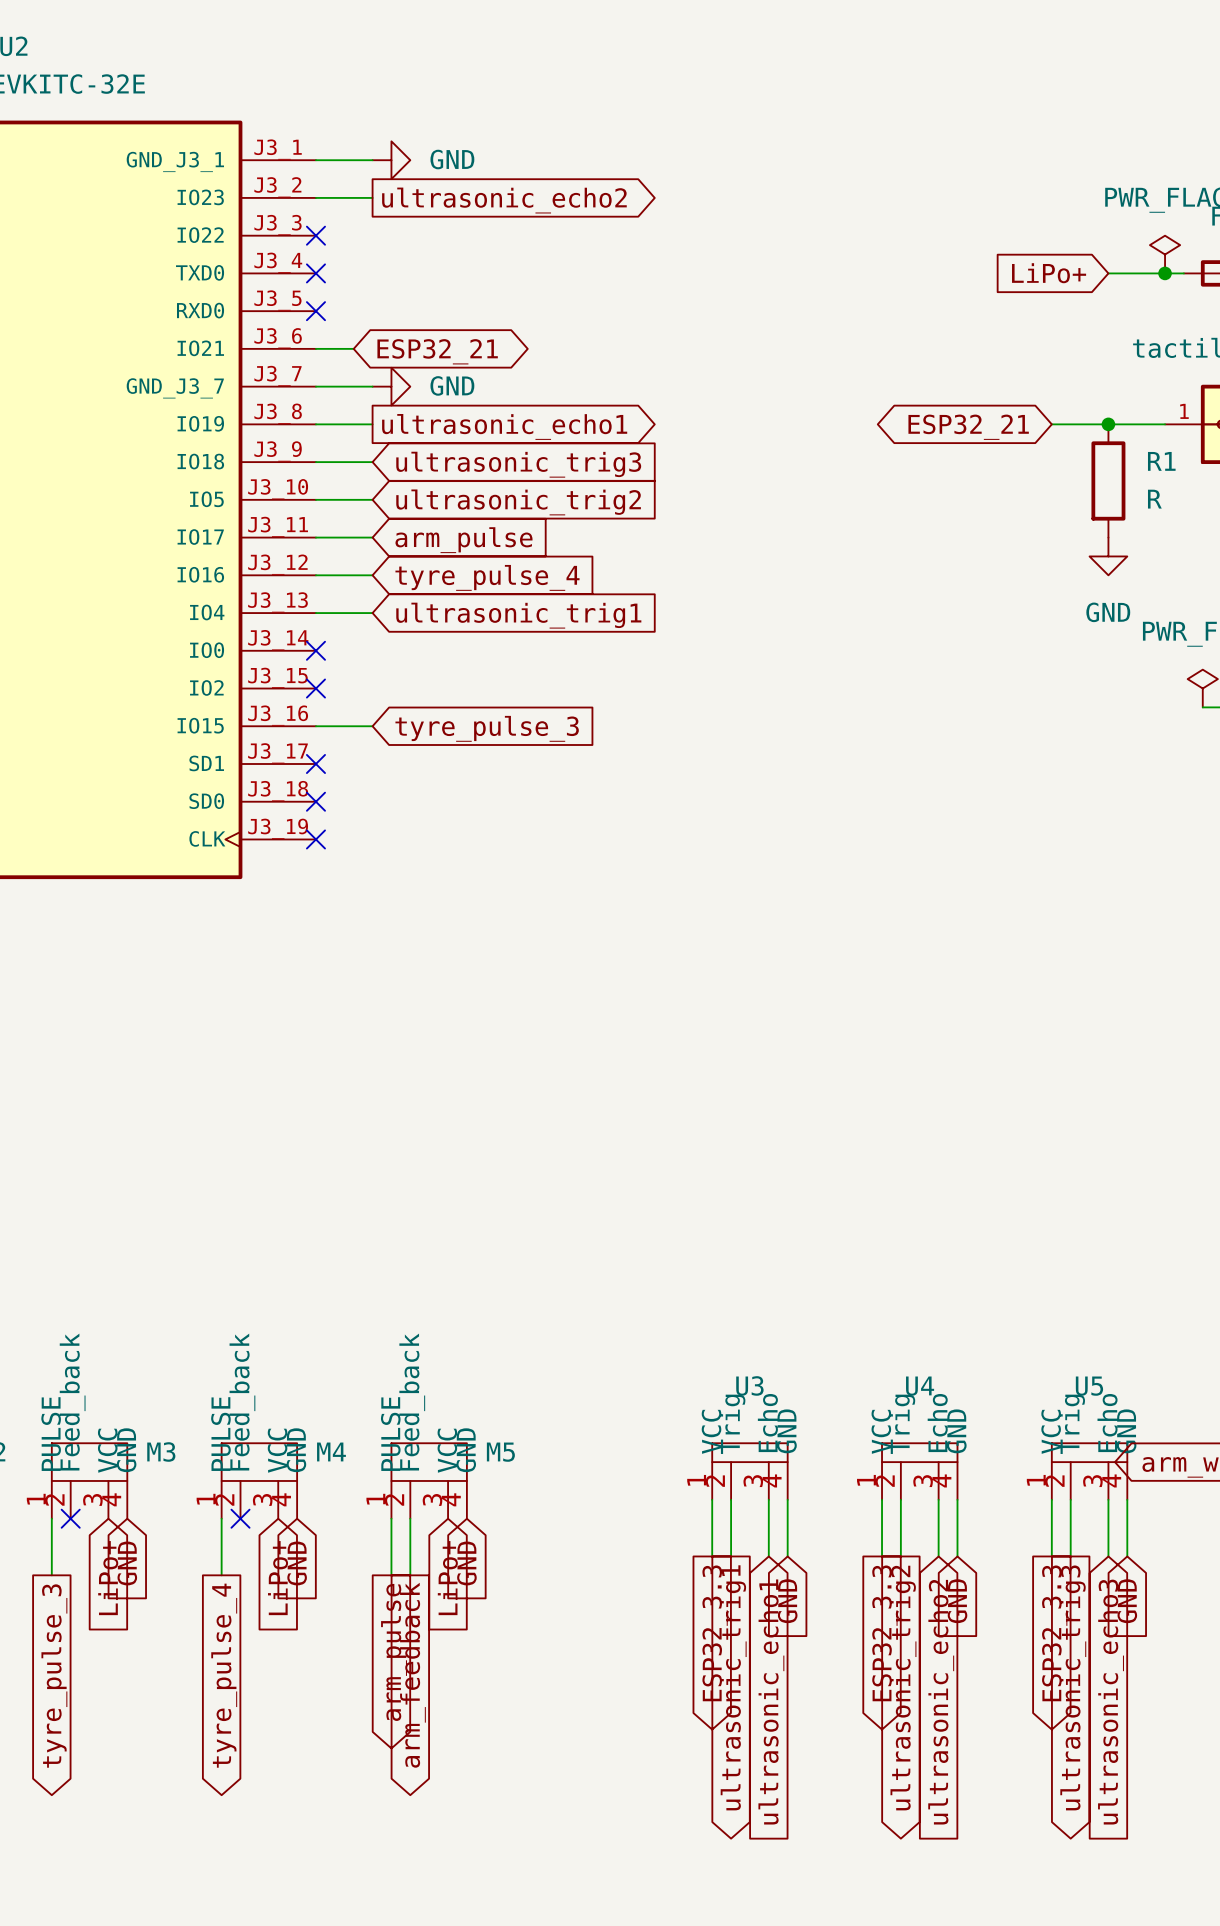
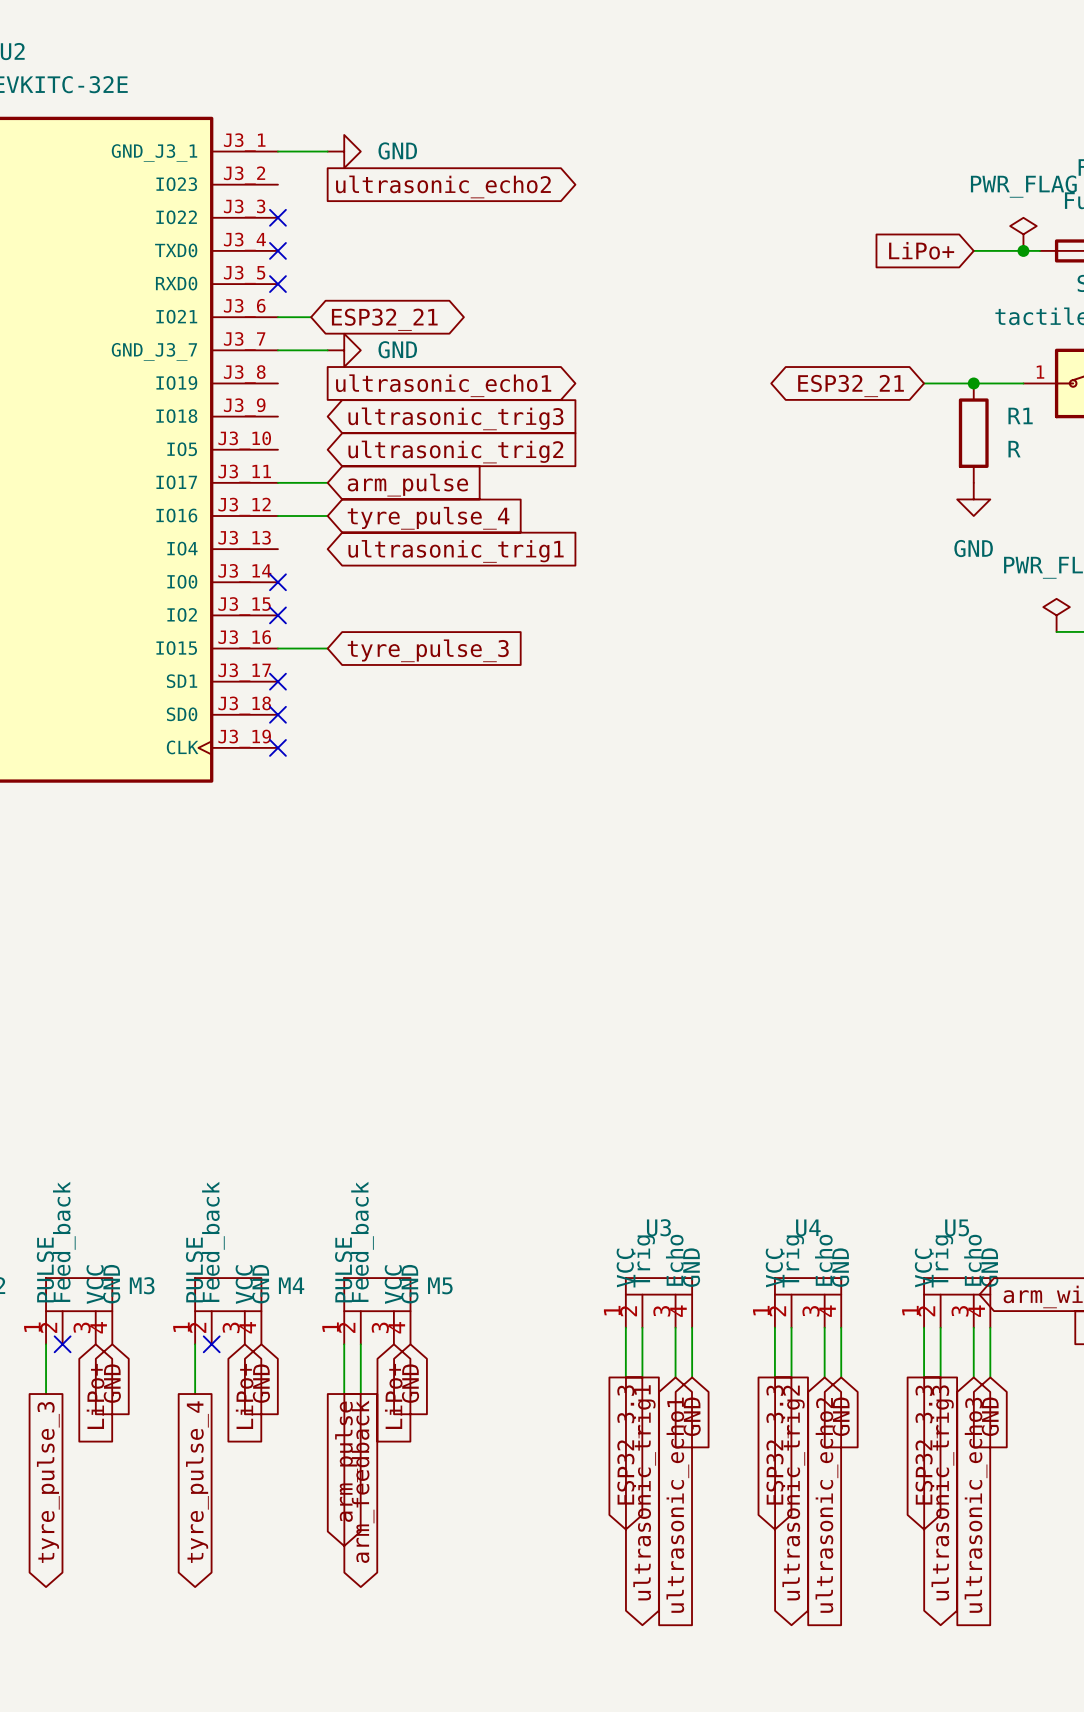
wire: (315, 197) (372, 197) -> none
wire: (315, 424) (372, 424) -> none
wire: (315, 462) (372, 462) -> none
wire: (315, 499) (372, 499) -> none
wire: (315, 613) (372, 613) -> none

